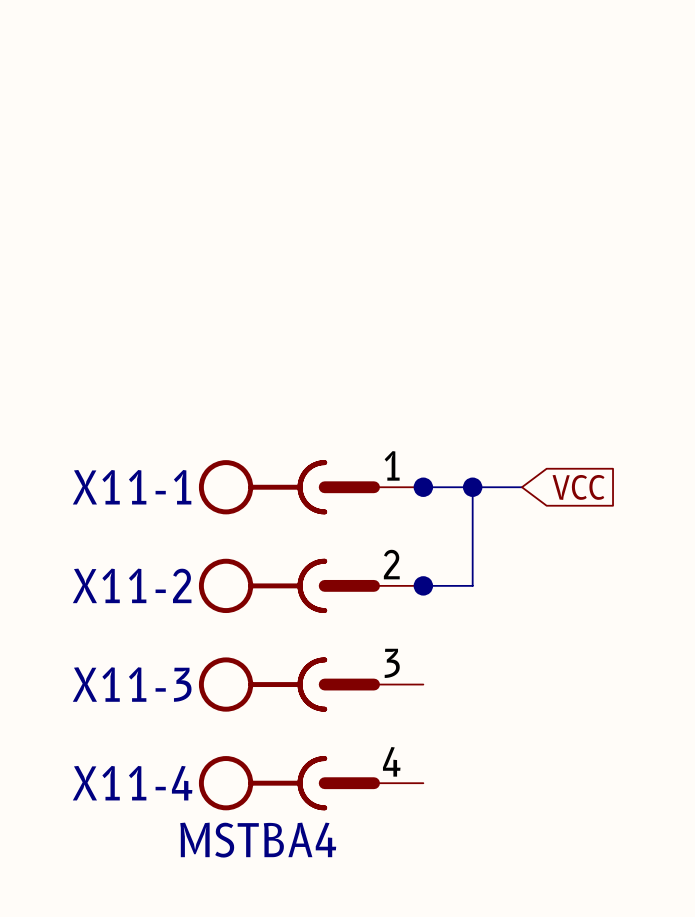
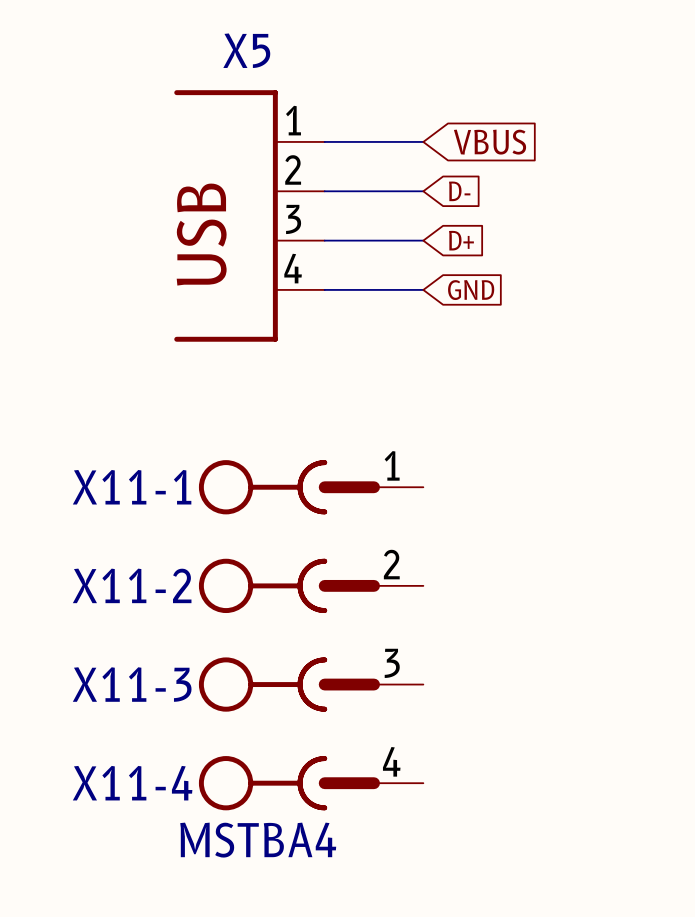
wire: none -> (324, 141) (423, 141)
global label: none -> VBUS (490, 142)
wire: none -> (324, 191) (423, 191)
global label: none -> D- (459, 191)
X5: none -> (249, 215)
wire: none -> (324, 240) (423, 240)
global label: none -> D+ (461, 240)
global label: none -> GND (471, 290)
wire: (423, 487) (522, 487) -> (324, 289) (423, 289)
junction: (423, 487) -> none
wire: (472, 487) (472, 585) (423, 585) -> none
junction: (472, 487) -> none
global label: VCC (578, 487) -> none
junction: (423, 585) -> none

